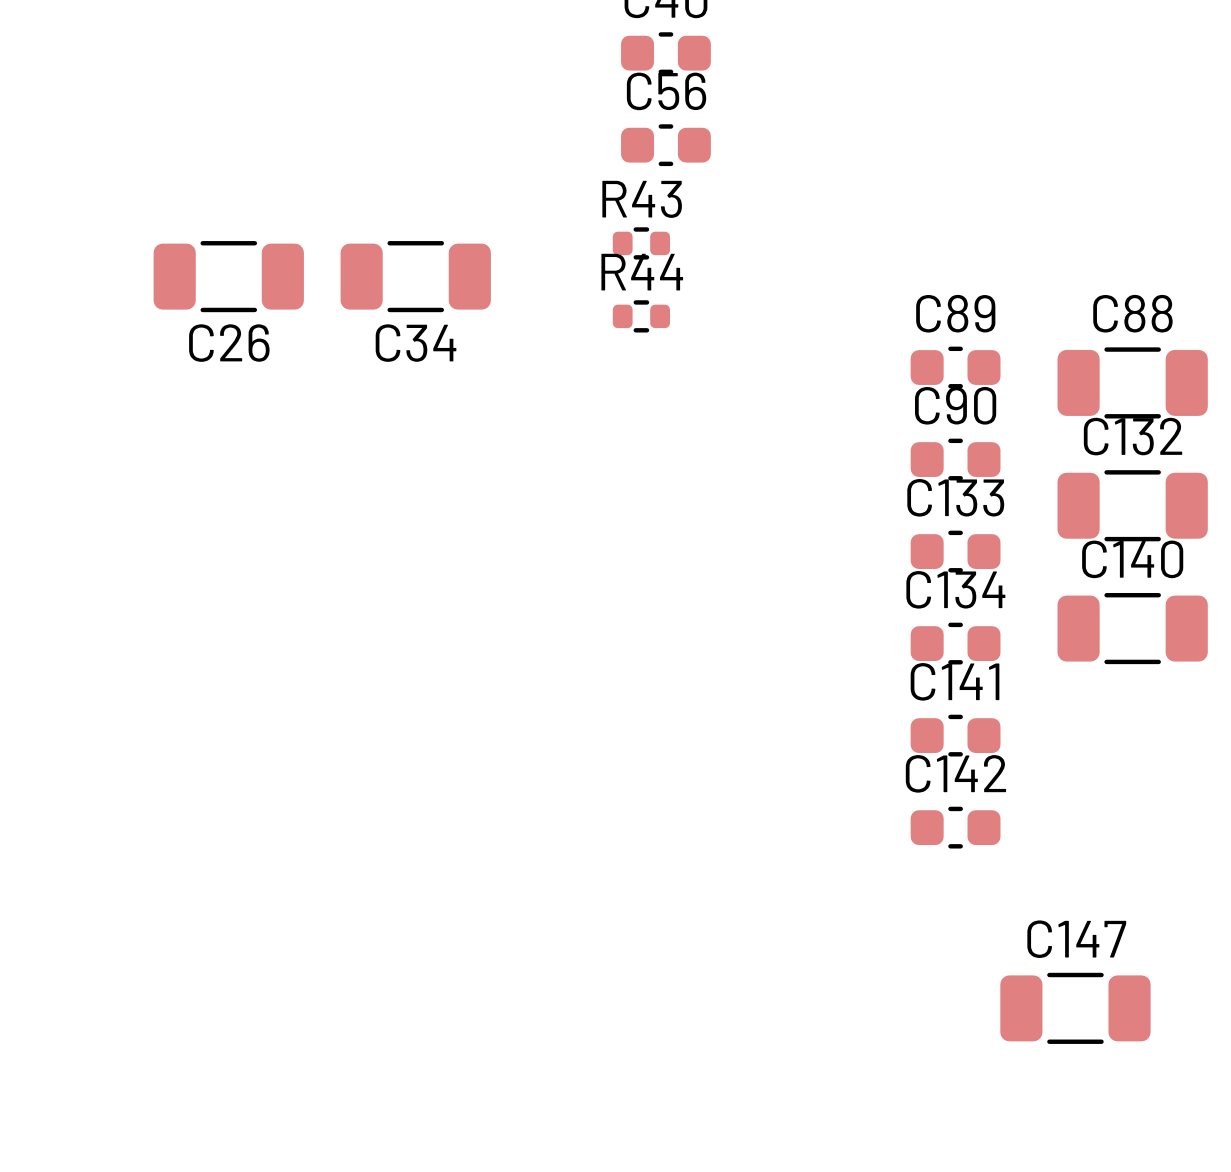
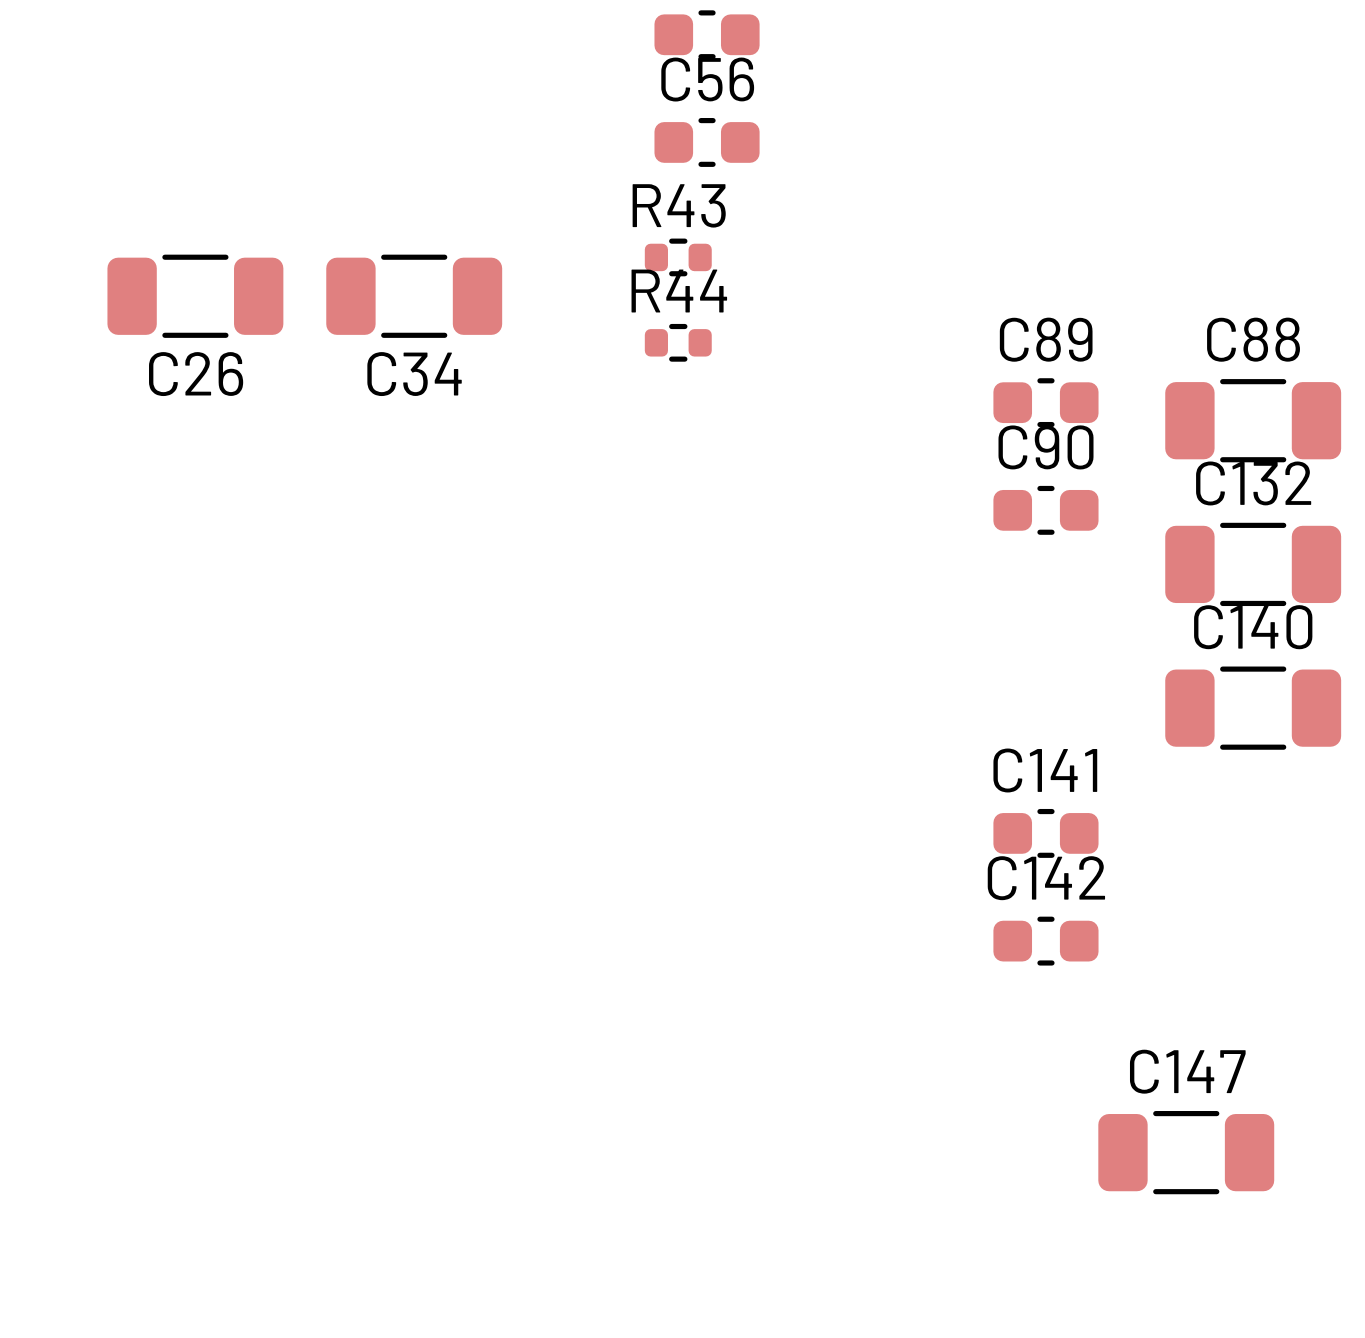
C133: (955, 551) -> none
C134: (955, 643) -> none

